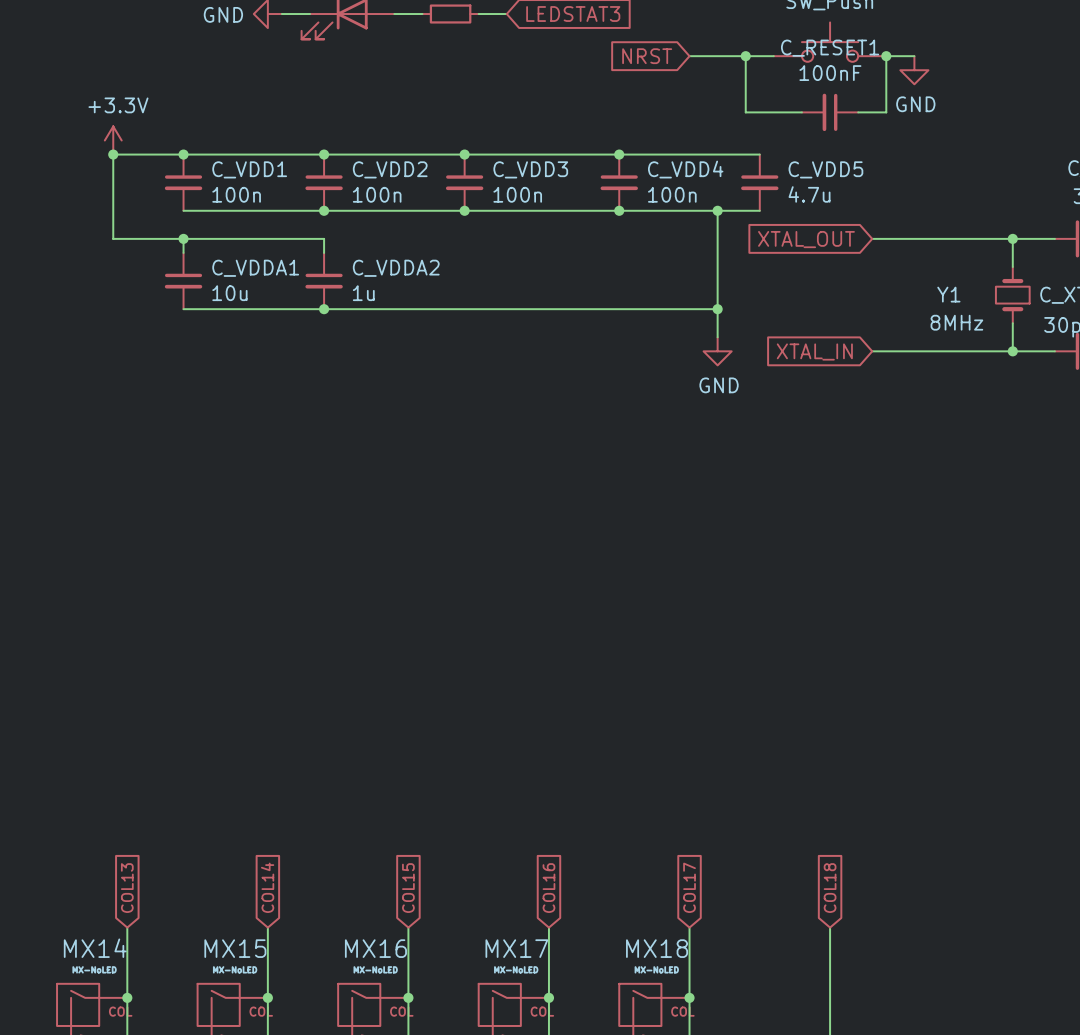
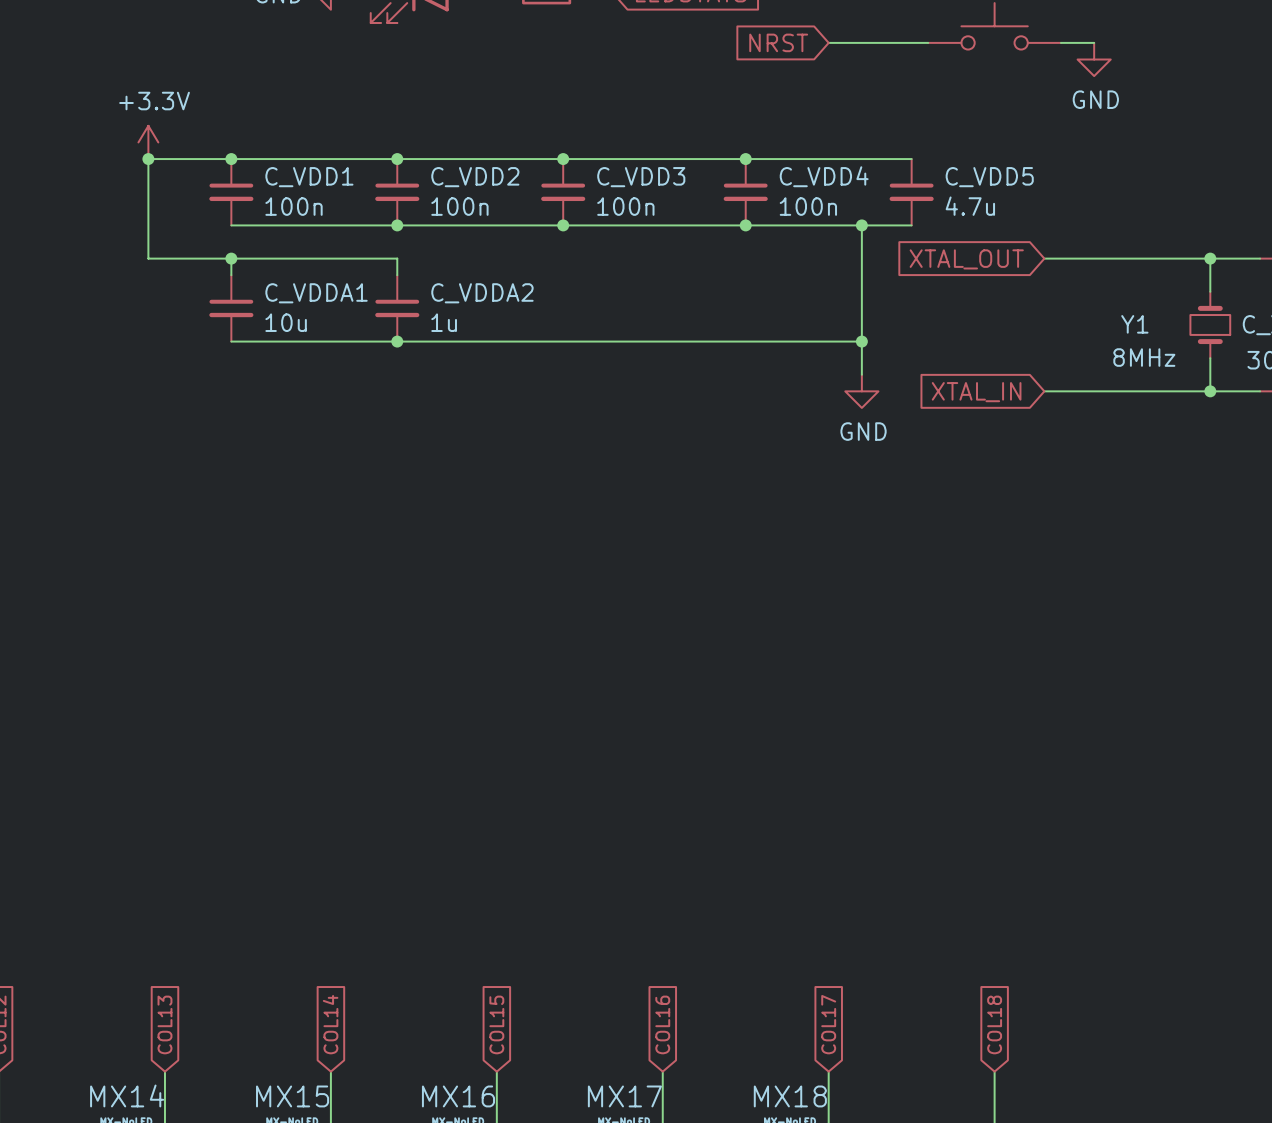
wire: (745, 56) (745, 112) (801, 112) -> none
junction: (745, 56) -> none
wire: (886, 56) (886, 112) (858, 112) -> none
junction: (886, 56) -> none
C_RESET1: 100nF (830, 112) -> none

